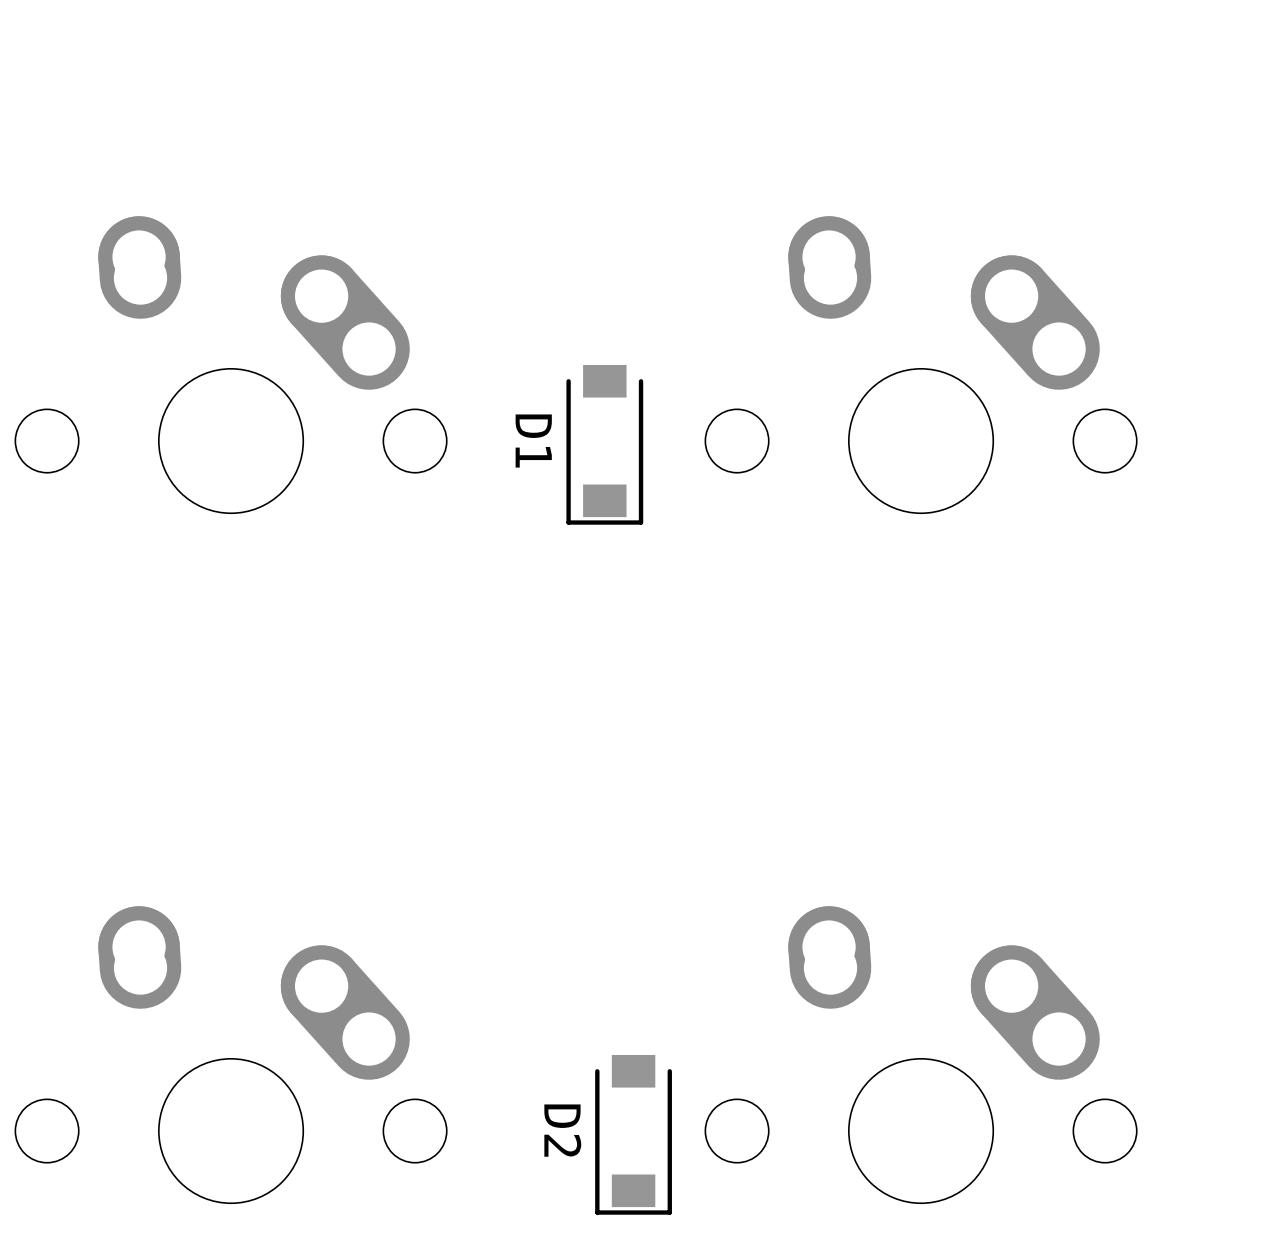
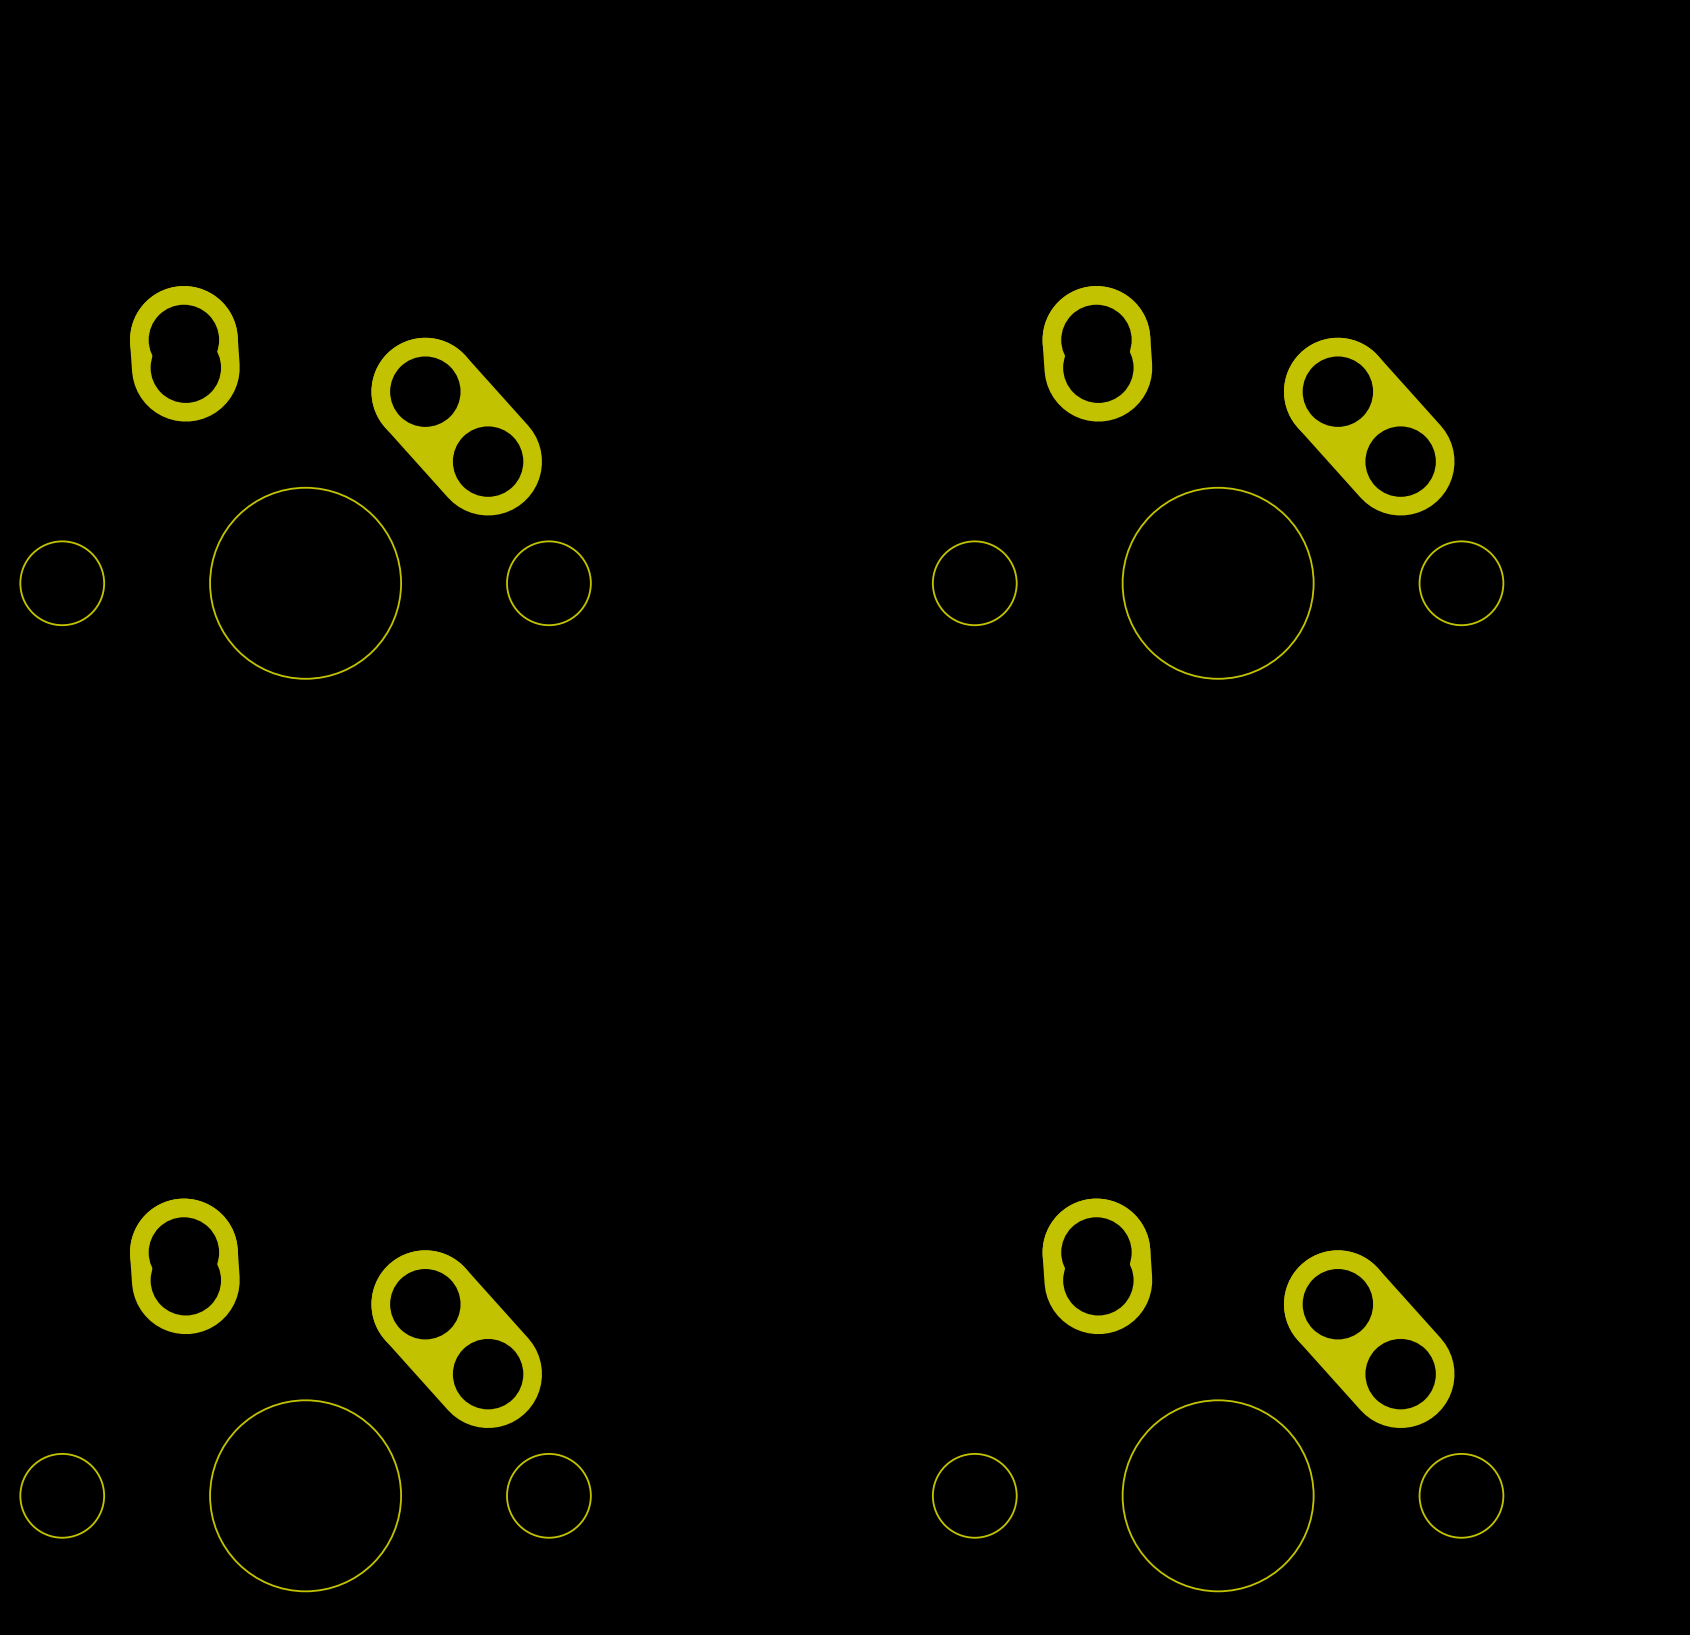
D1: (604, 444) -> none
D2: (633, 1134) -> none

